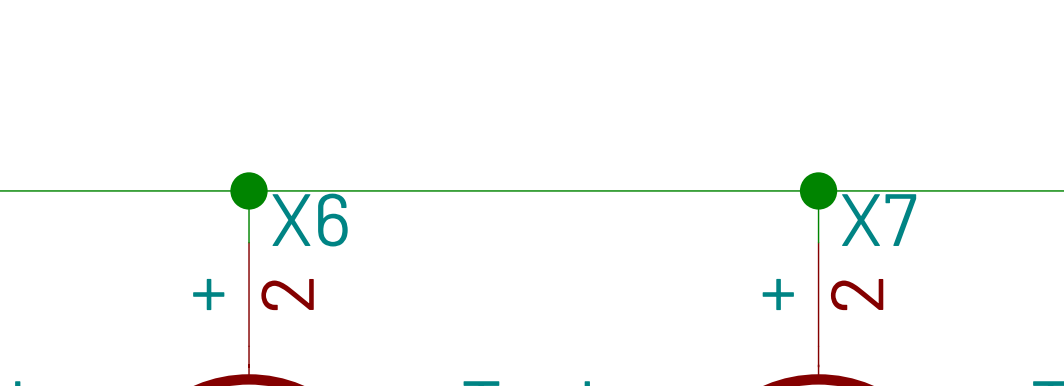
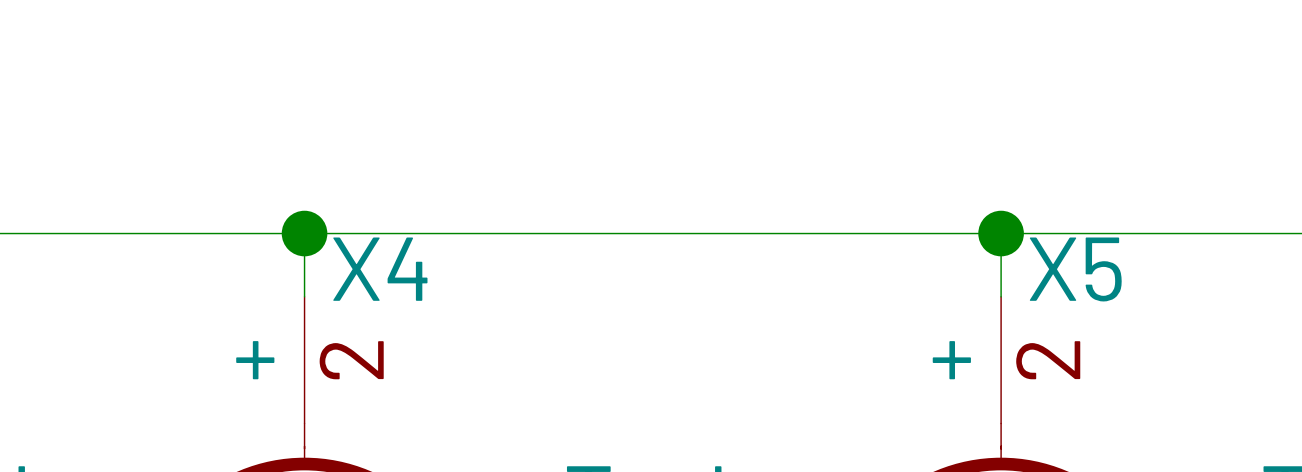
X6 name: X6 (310, 220) -> X4 (380, 269)
X7 name: X7 (879, 220) -> X5 (1075, 269)

